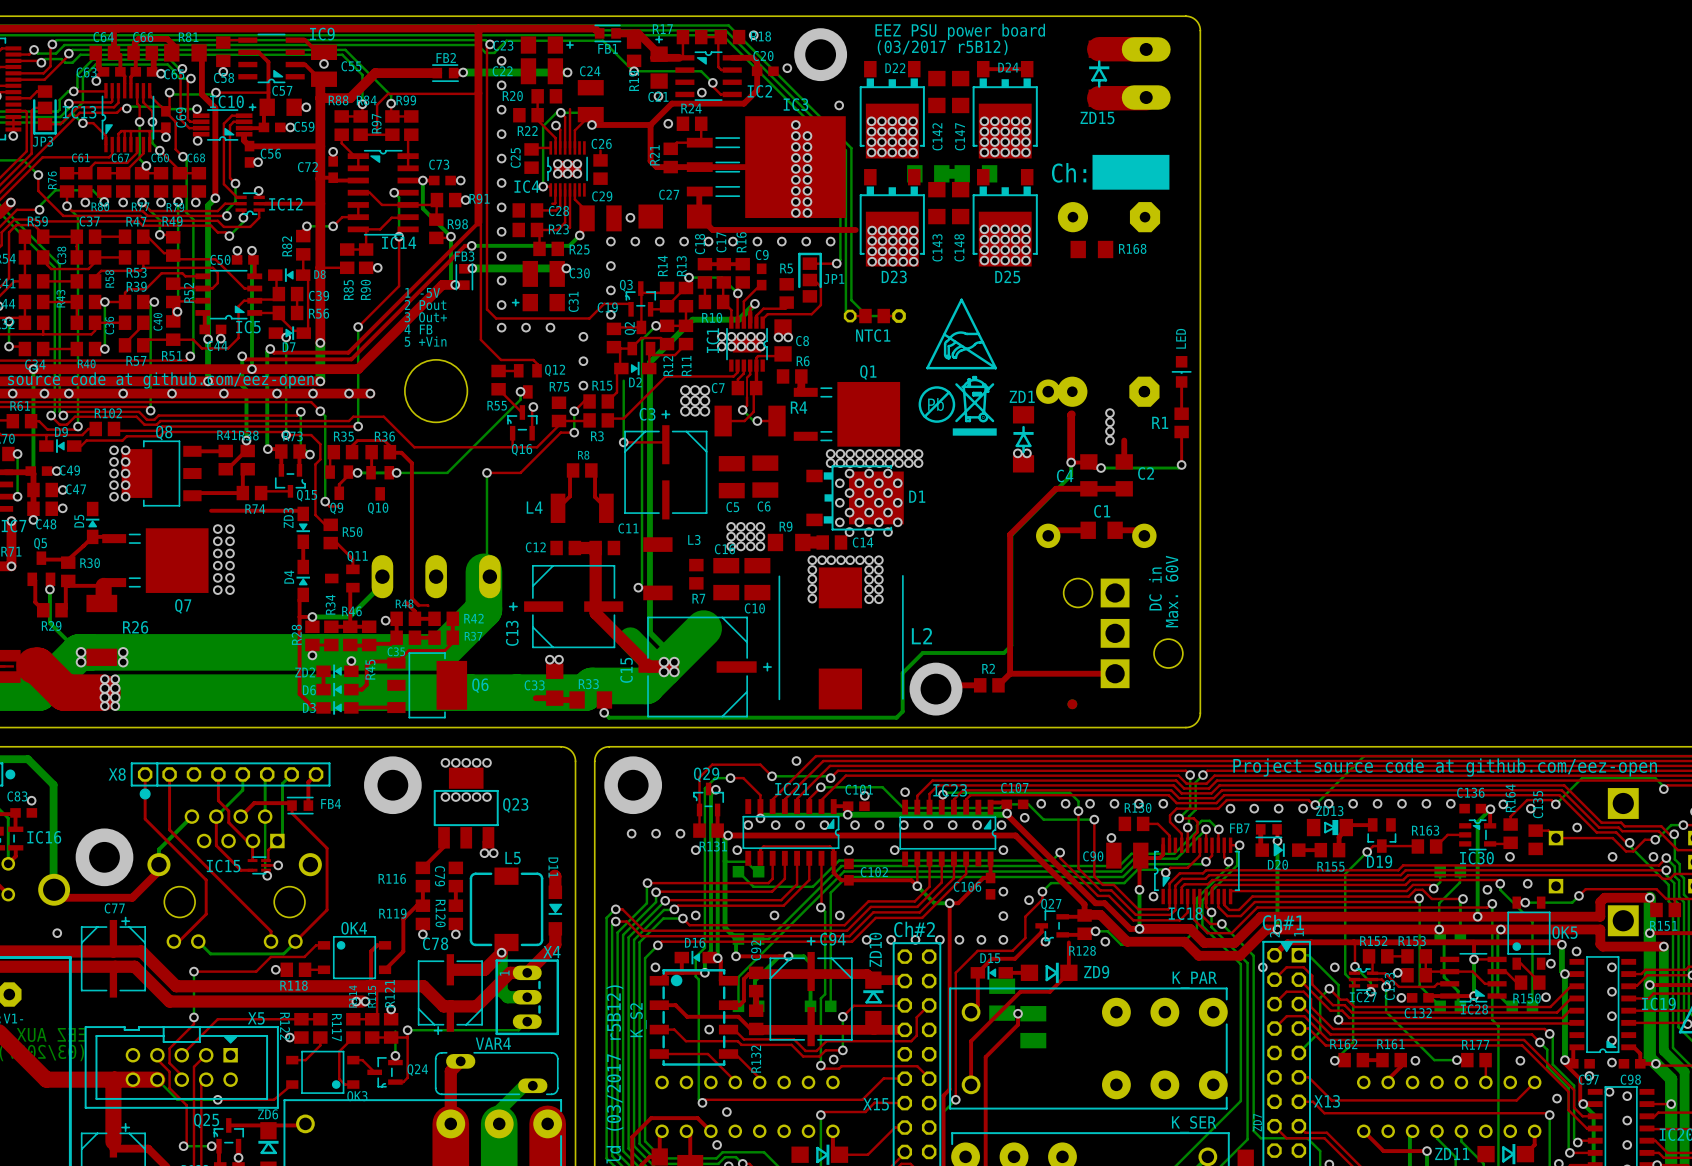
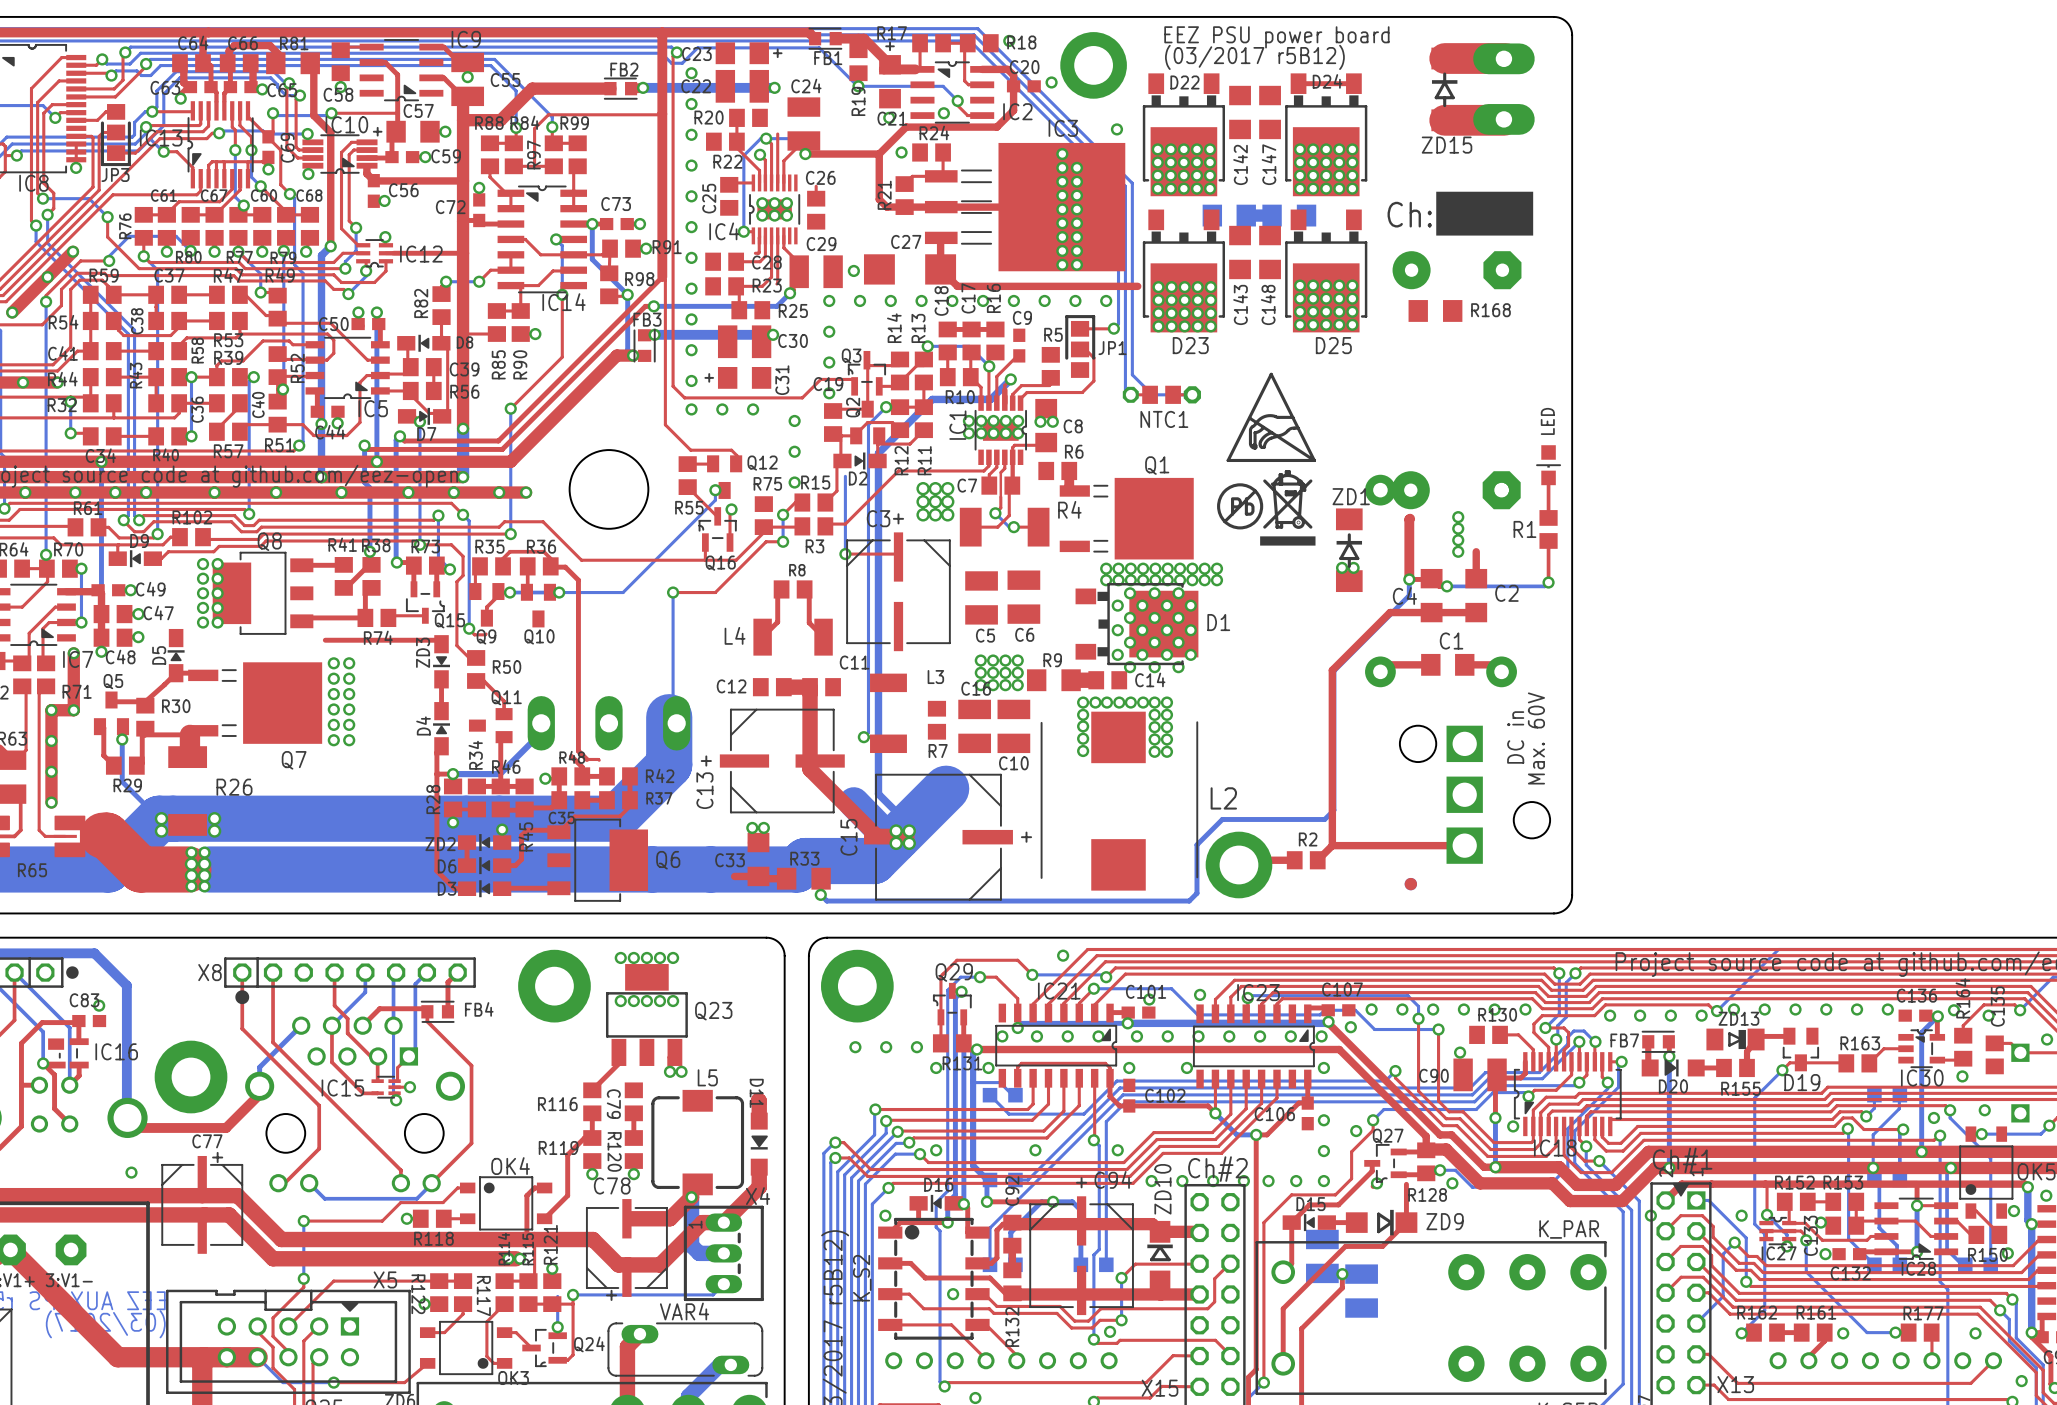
text: 1 -5V (422, 292) -> none
text: 2 Pout (425, 305) -> none
text: 3 Out+ (425, 317) -> none
text: 4 FB (418, 329) -> none
text: 5 +Vin (425, 341) -> none

